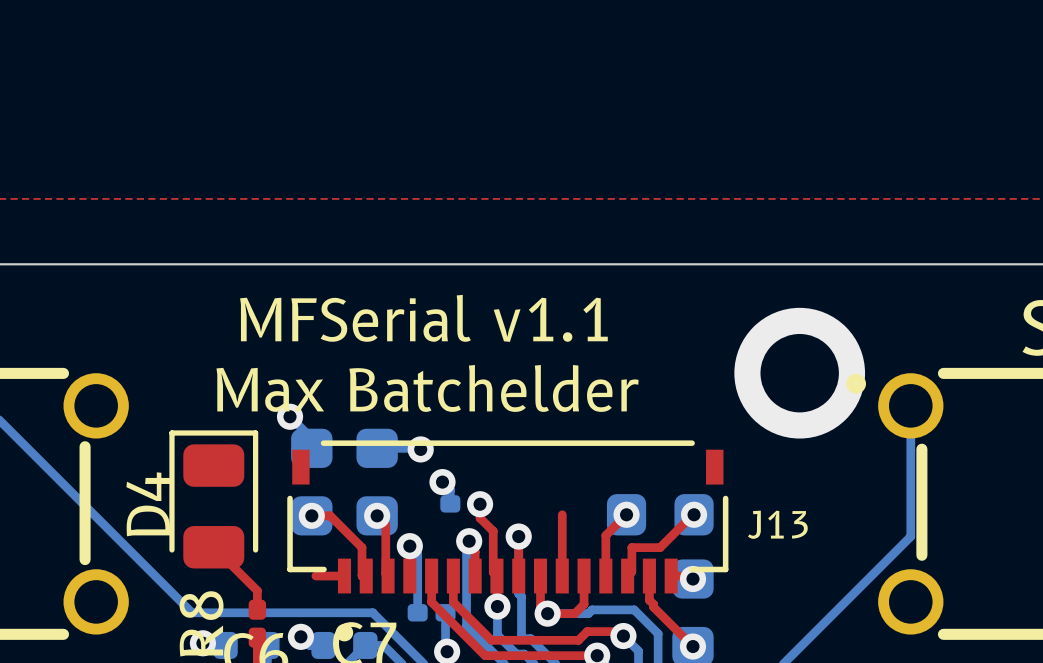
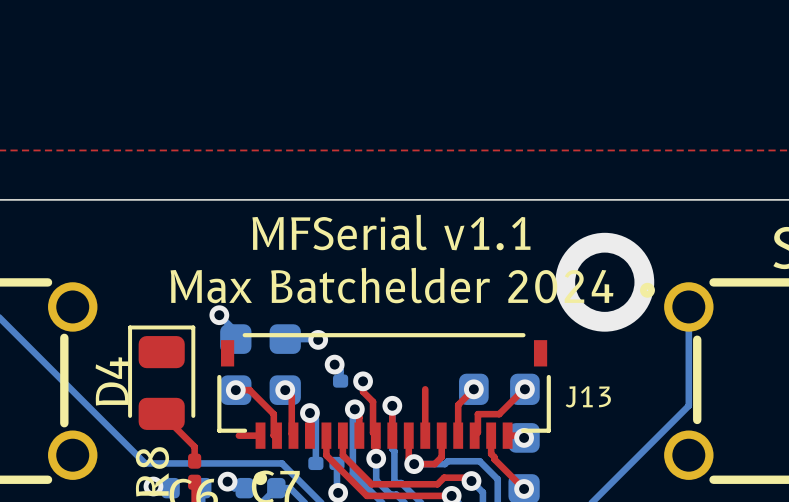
text position: MFSerial v1.1 (423, 318) -> MFSerial v1.1 (391, 232)
text: Max Batchelder (427, 388) -> Max Batchelder 2024 (392, 285)

